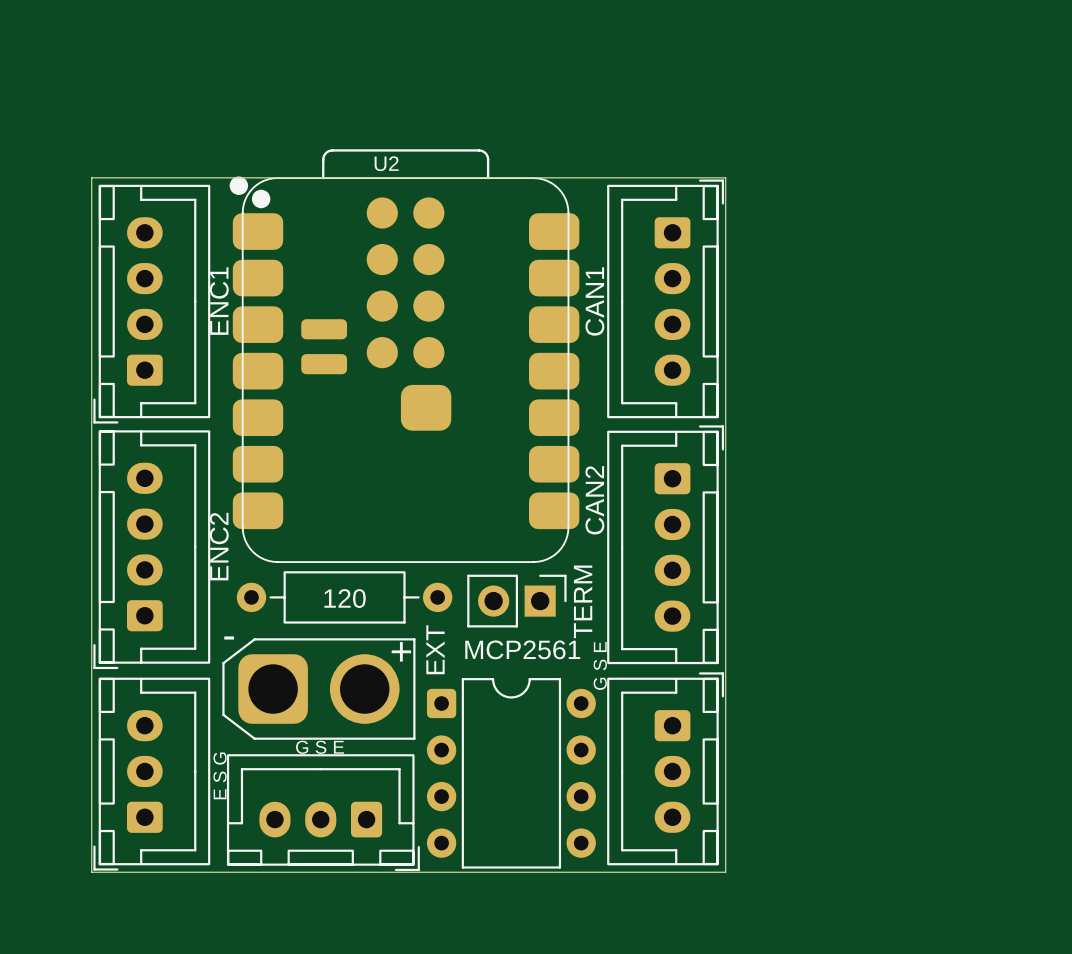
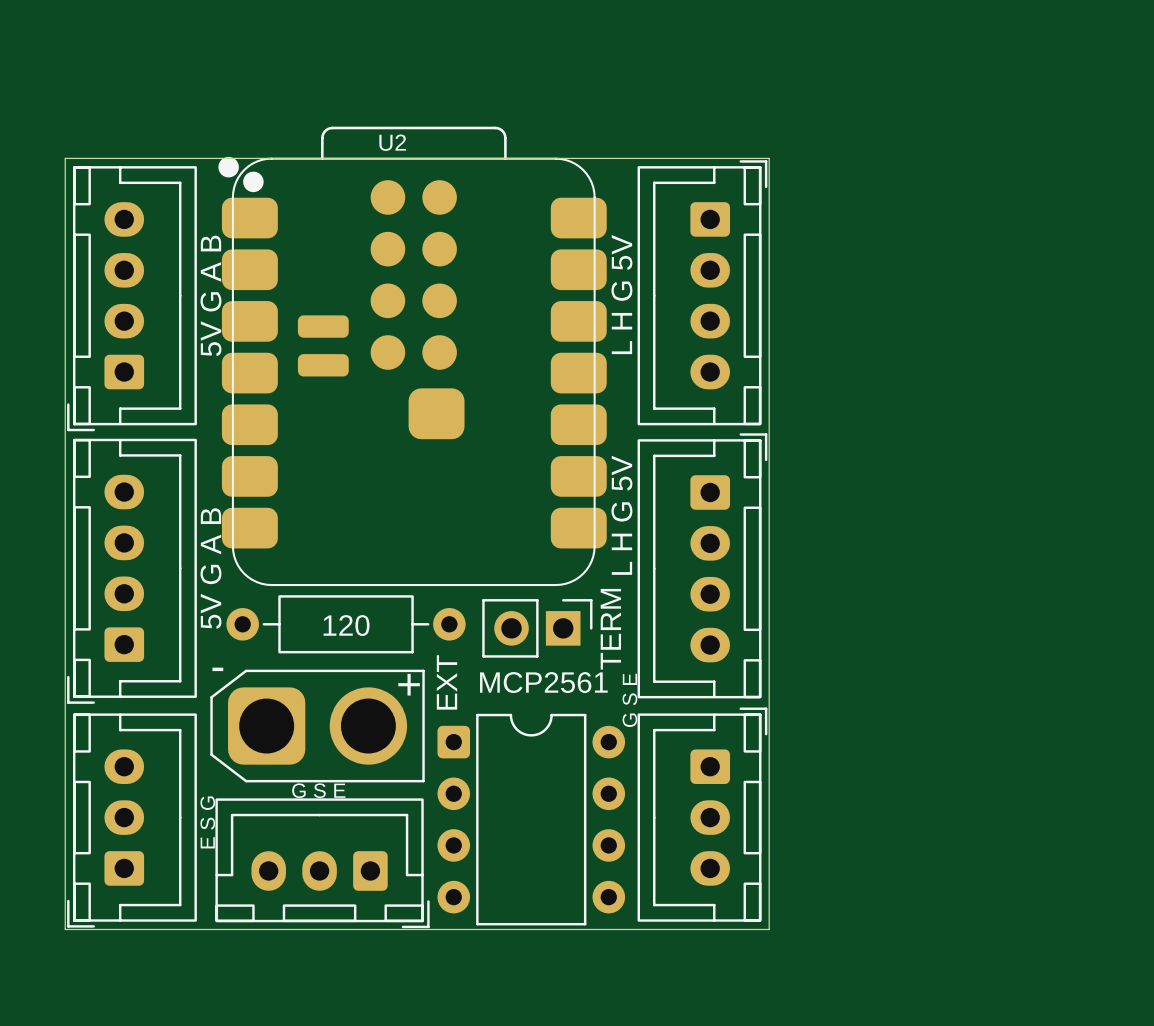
ENC1 name: ENC1 (219, 301) -> 5V G A B (210, 295)
CAN1 name: CAN1 (594, 301) -> L H G 5V (621, 294)
CAN2 name: CAN2 (594, 500) -> L H G 5V (621, 515)
ENC2 name: ENC2 (219, 546) -> 5V G A B (210, 568)

